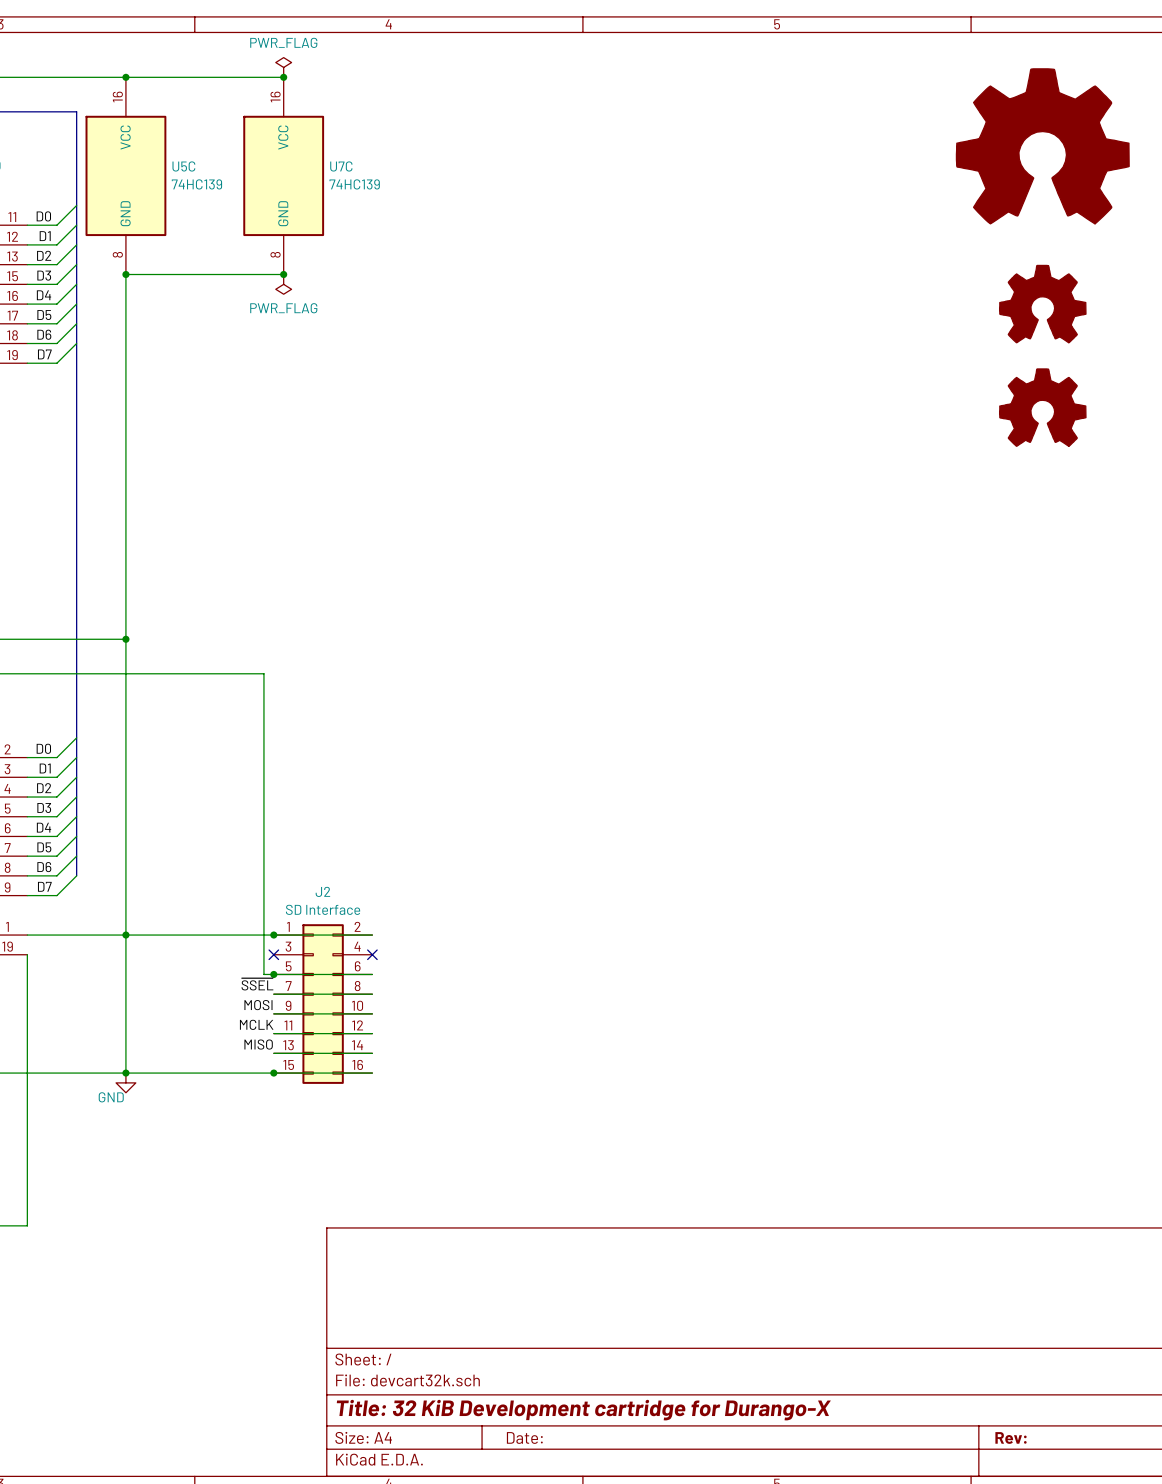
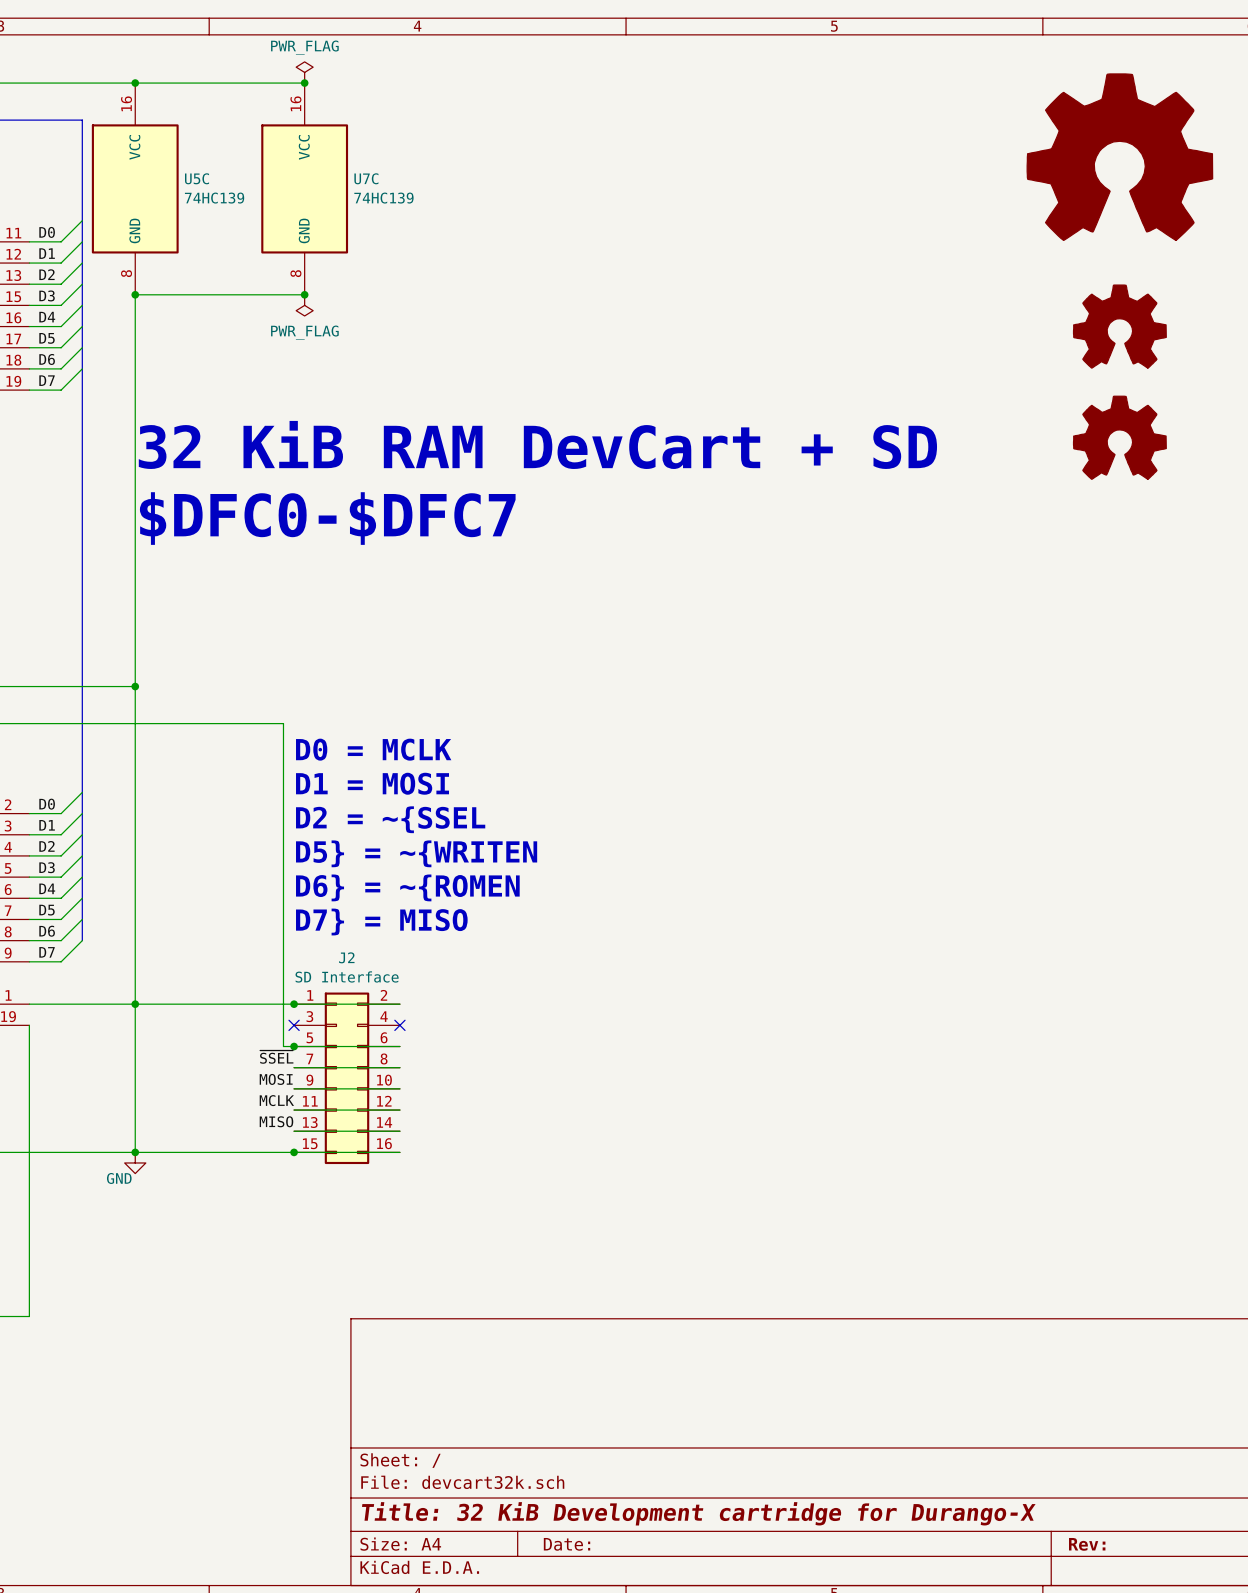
text: none -> 32 KiB RAM DevCart + SD (537, 444)
text: none -> $DFC0-$DFC7 (327, 518)
text: none -> D0 = MCLK (373, 749)
text: none -> D1 = MOSI (372, 783)
text: none -> D2 = ~{SSEL (390, 819)
text: none -> D5} = ~{WRITEN (416, 853)
text: none -> D6} = ~{ROMEN (407, 887)
text: none -> D7} = MISO (381, 922)

